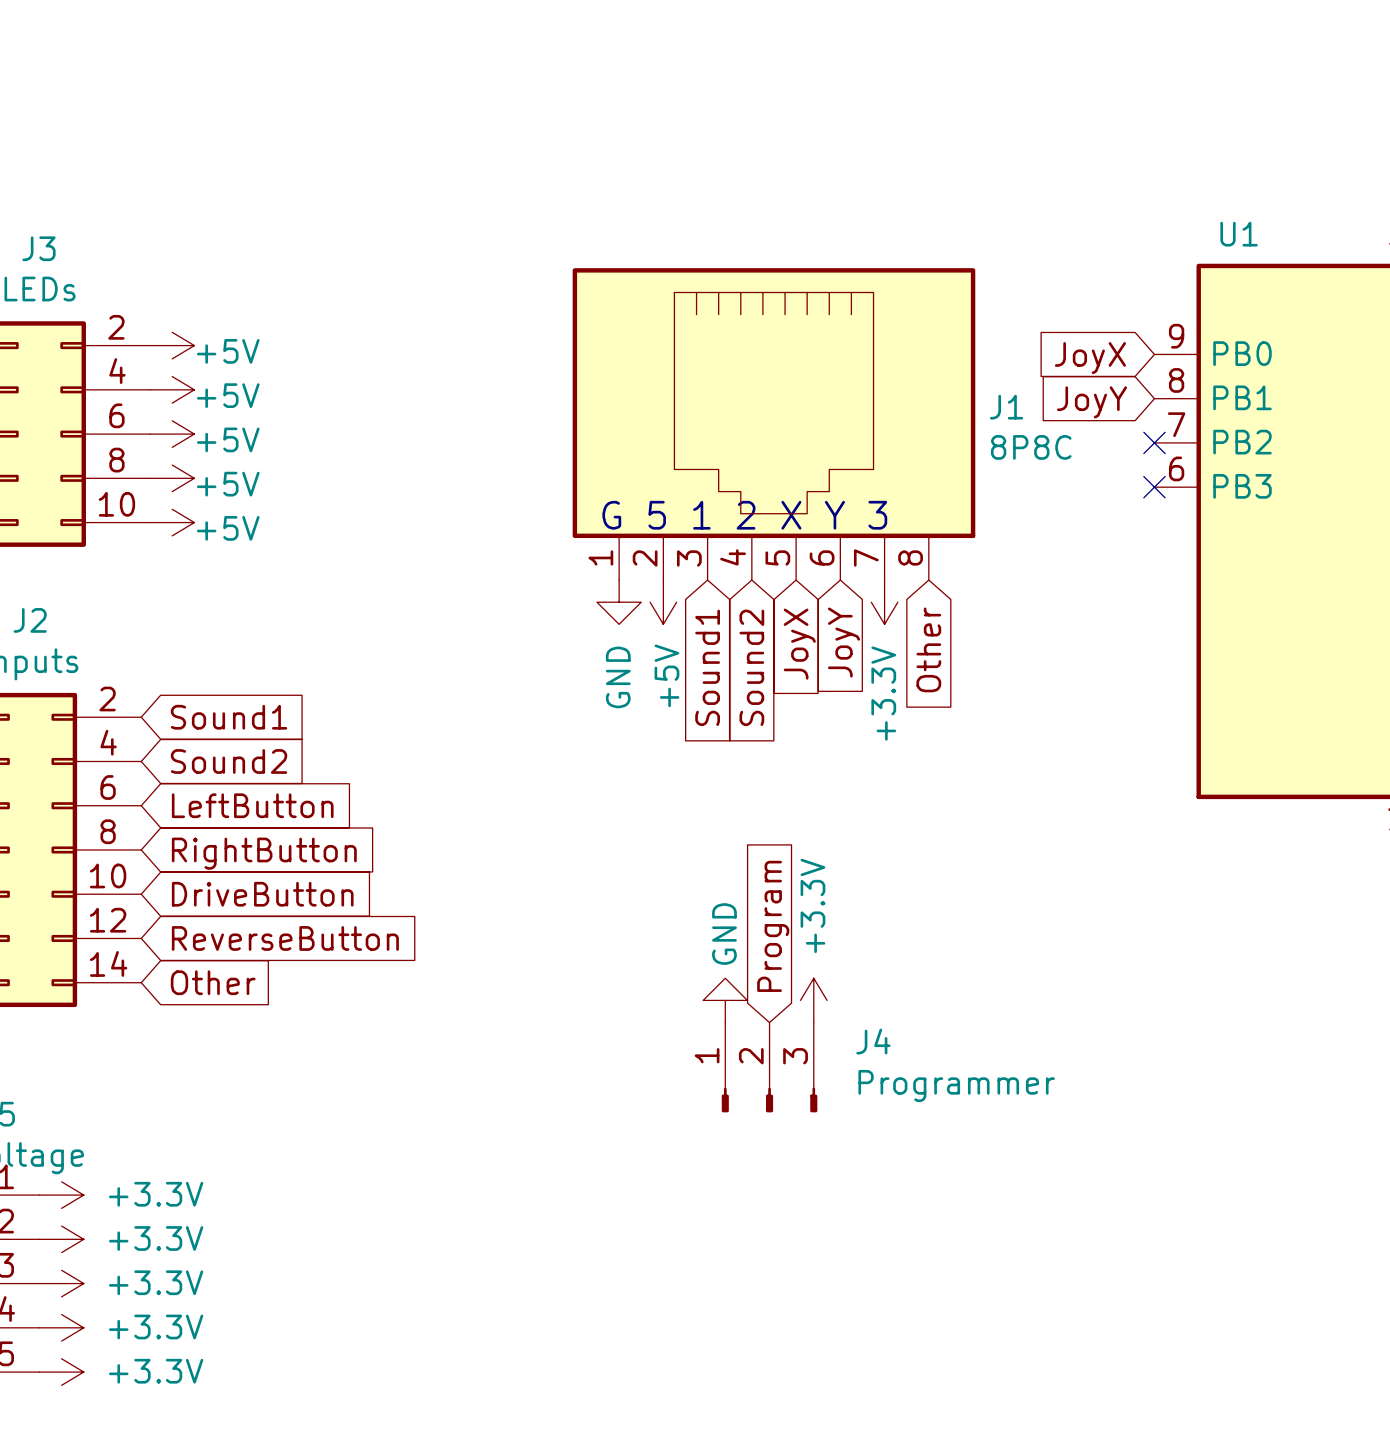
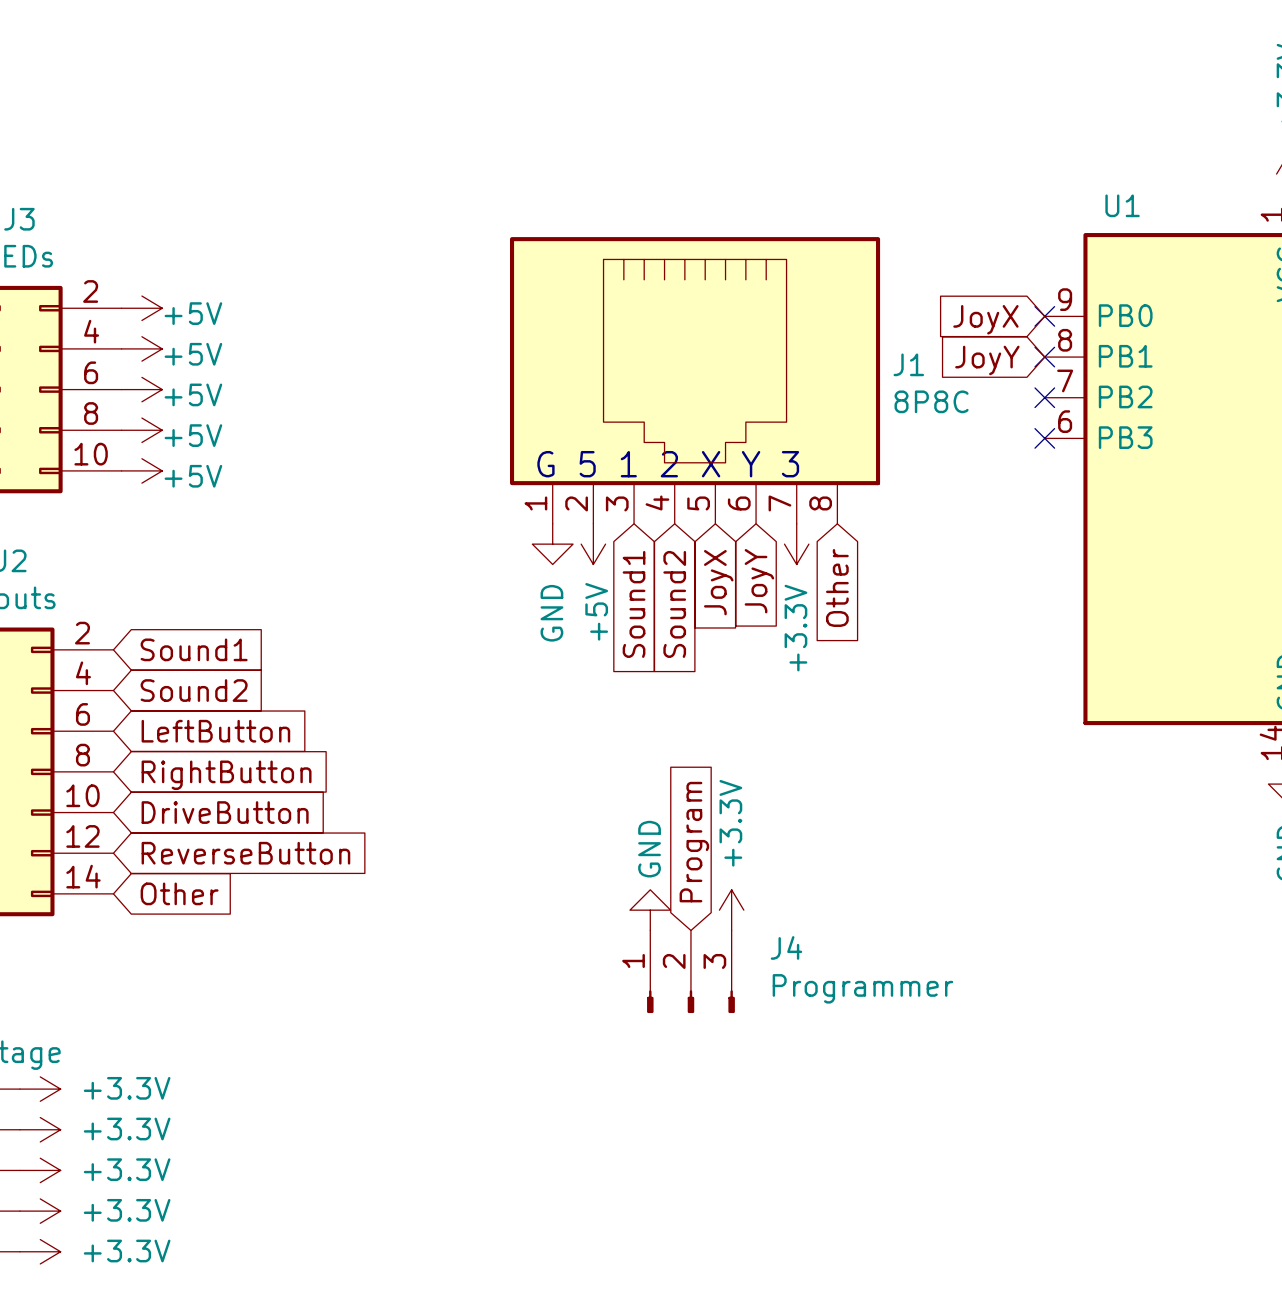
no-connect mark: none -> (1044, 316)
no-connect mark: none -> (1044, 357)

